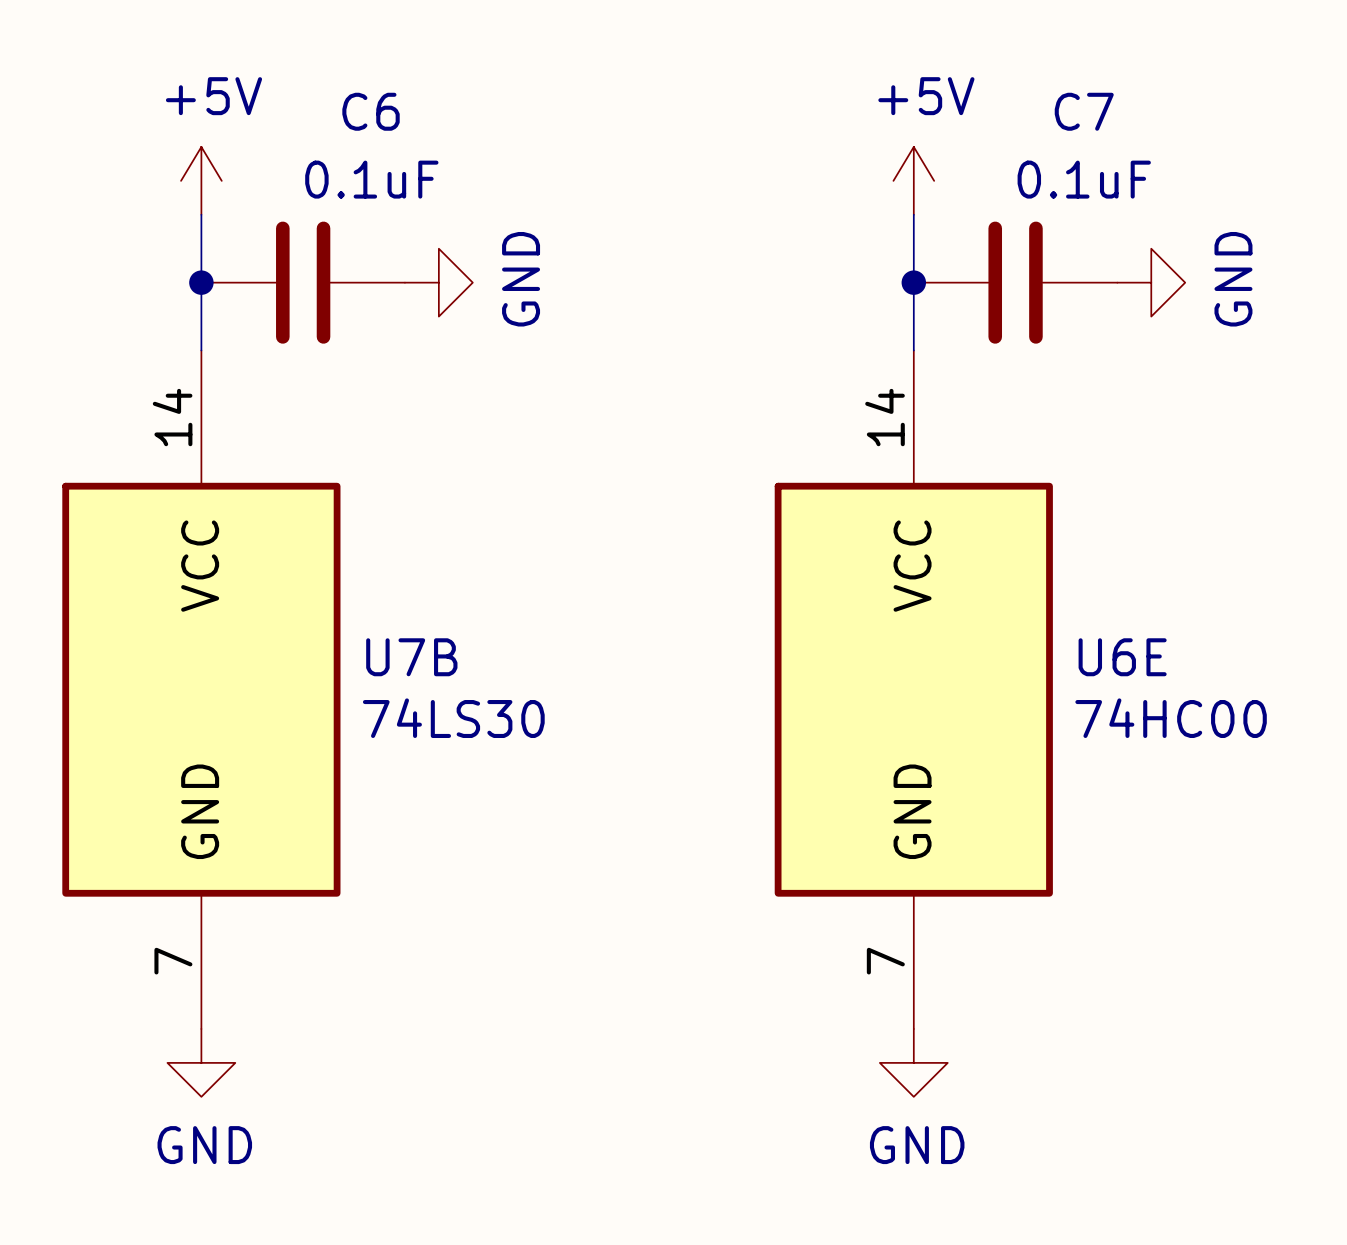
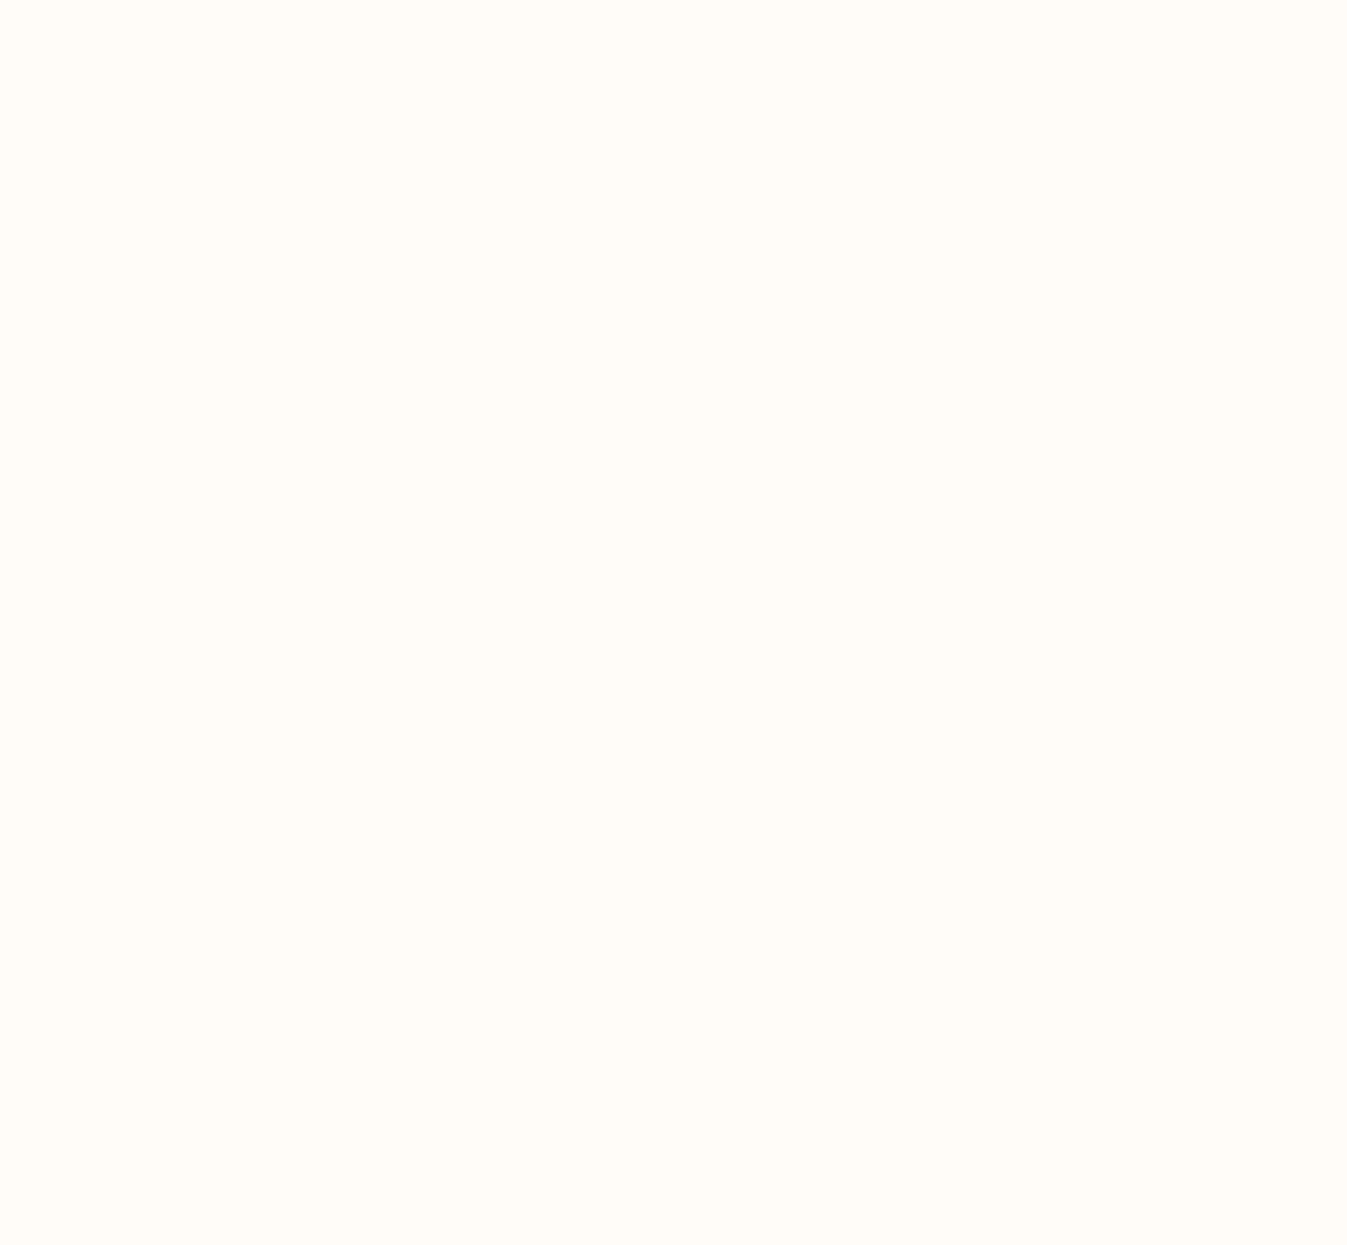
power symbol: +5V (201, 180) -> none
power symbol: +5V (913, 180) -> none
wire: (201, 214) (201, 350) -> none
wire: (913, 214) (913, 350) -> none
junction: (201, 282) -> none
C6: 0.1uF (303, 282) -> none
power symbol: GND (438, 282) -> none
junction: (913, 282) -> none
C7: 0.1uF (1015, 282) -> none
power symbol: GND (1151, 282) -> none
U7B: 74LS30 (201, 689) -> none
U6E: 74HC00 (913, 689) -> none
power symbol: GND (201, 1062) -> none
power symbol: GND (913, 1062) -> none

